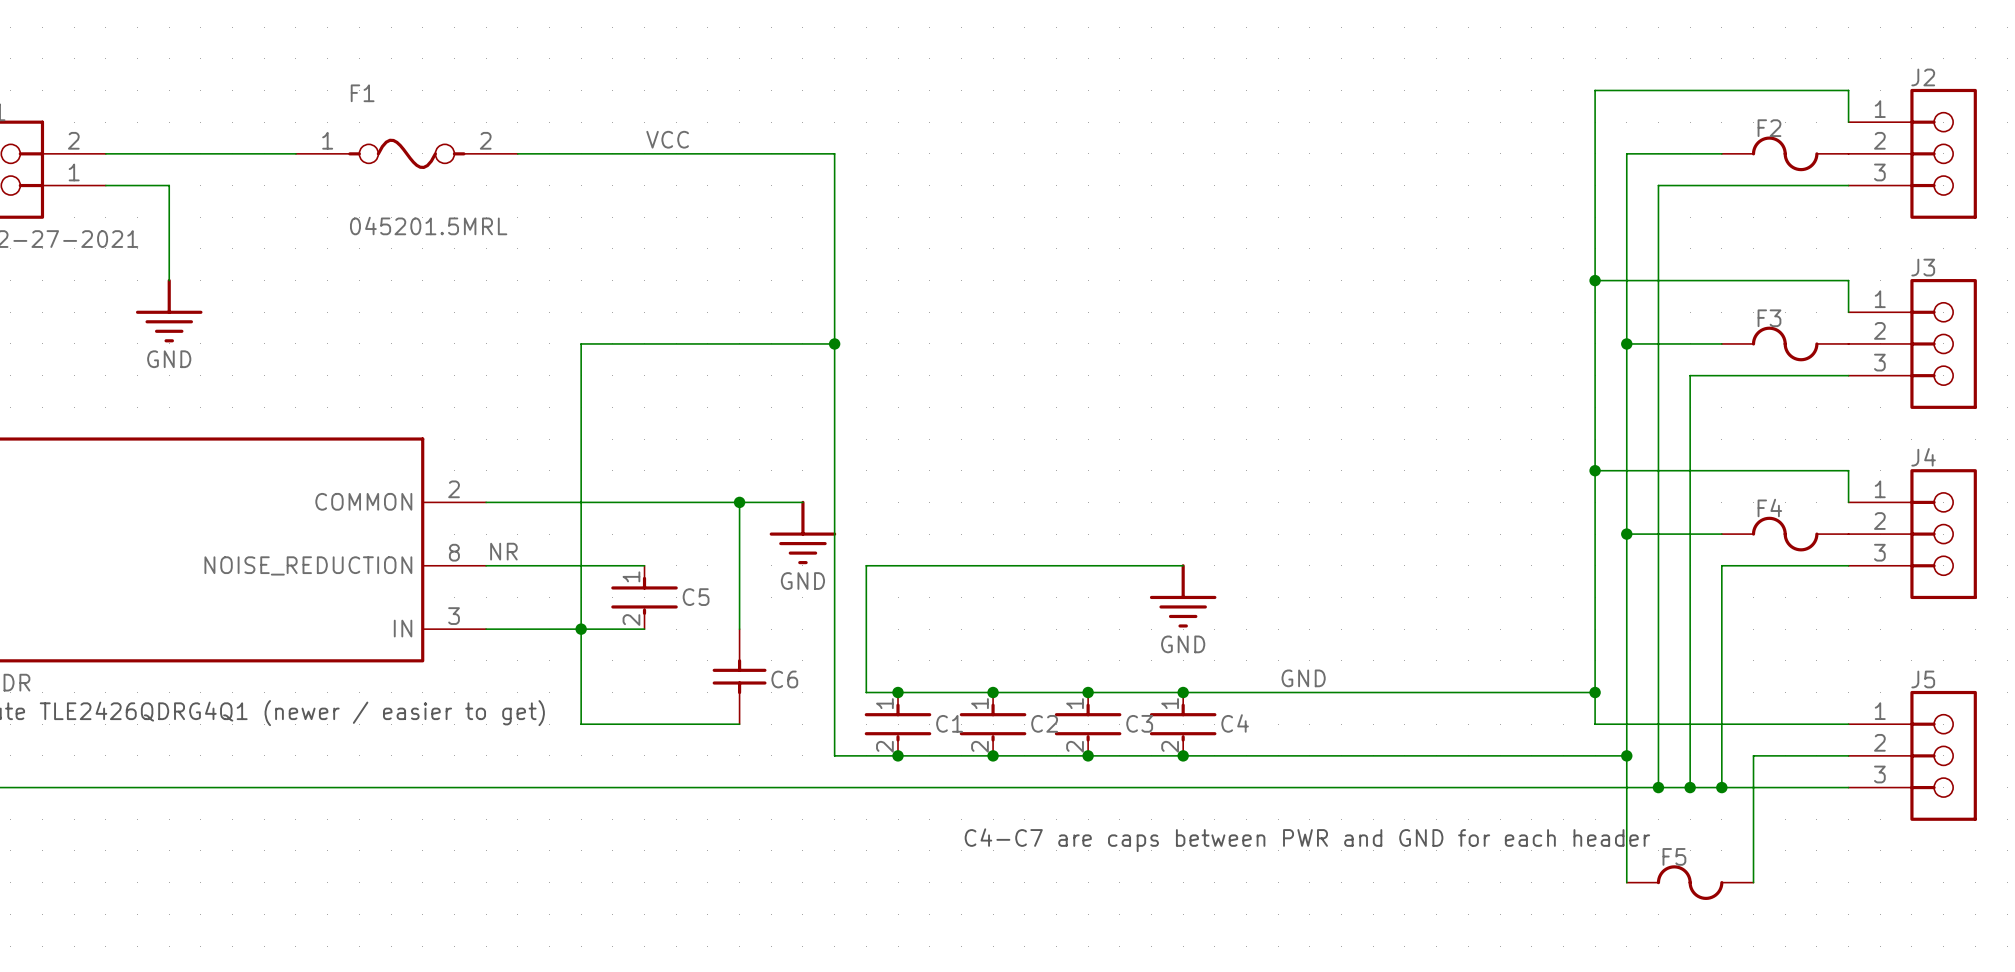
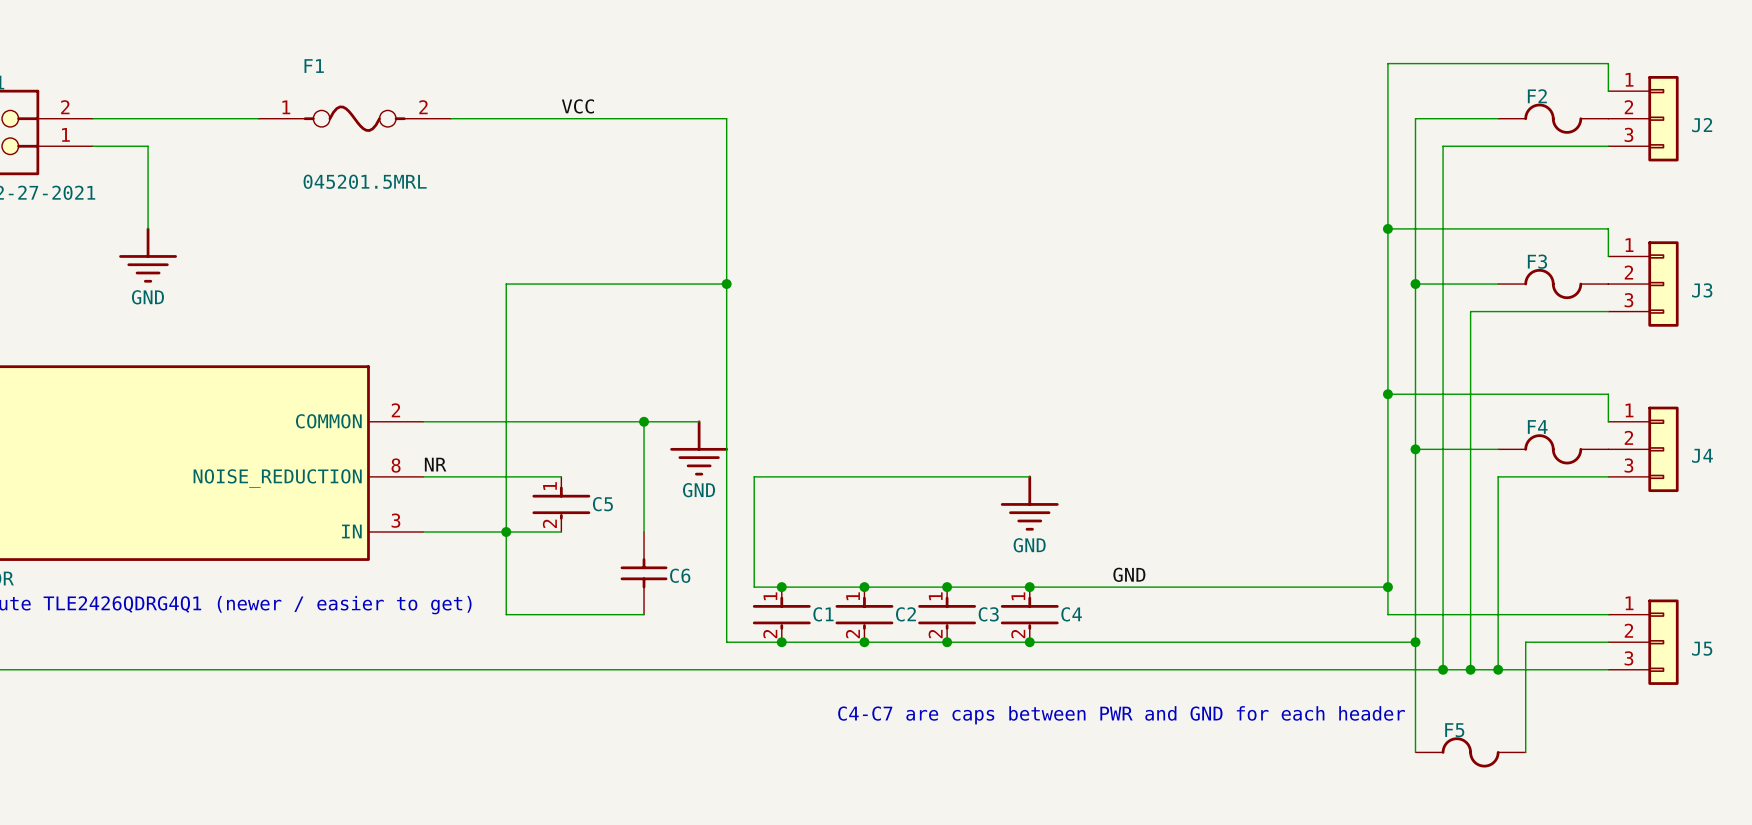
J2 name position: J2 (1923, 77) -> J2 (1702, 125)
J2 symbol: [1848, 88, 1977, 219] -> [1608, 76, 1679, 162]
J3 name position: J3 (1923, 267) -> J3 (1702, 290)
J3 symbol: [1848, 279, 1977, 409] -> [1608, 241, 1679, 327]
J4 name position: J4 (1923, 457) -> J4 (1702, 455)
J4 symbol: [1848, 469, 1977, 600] -> [1608, 406, 1679, 493]
J5 name position: J5 (1923, 679) -> J5 (1702, 648)
J5 symbol: [1848, 690, 1977, 821] -> [1608, 599, 1679, 685]

